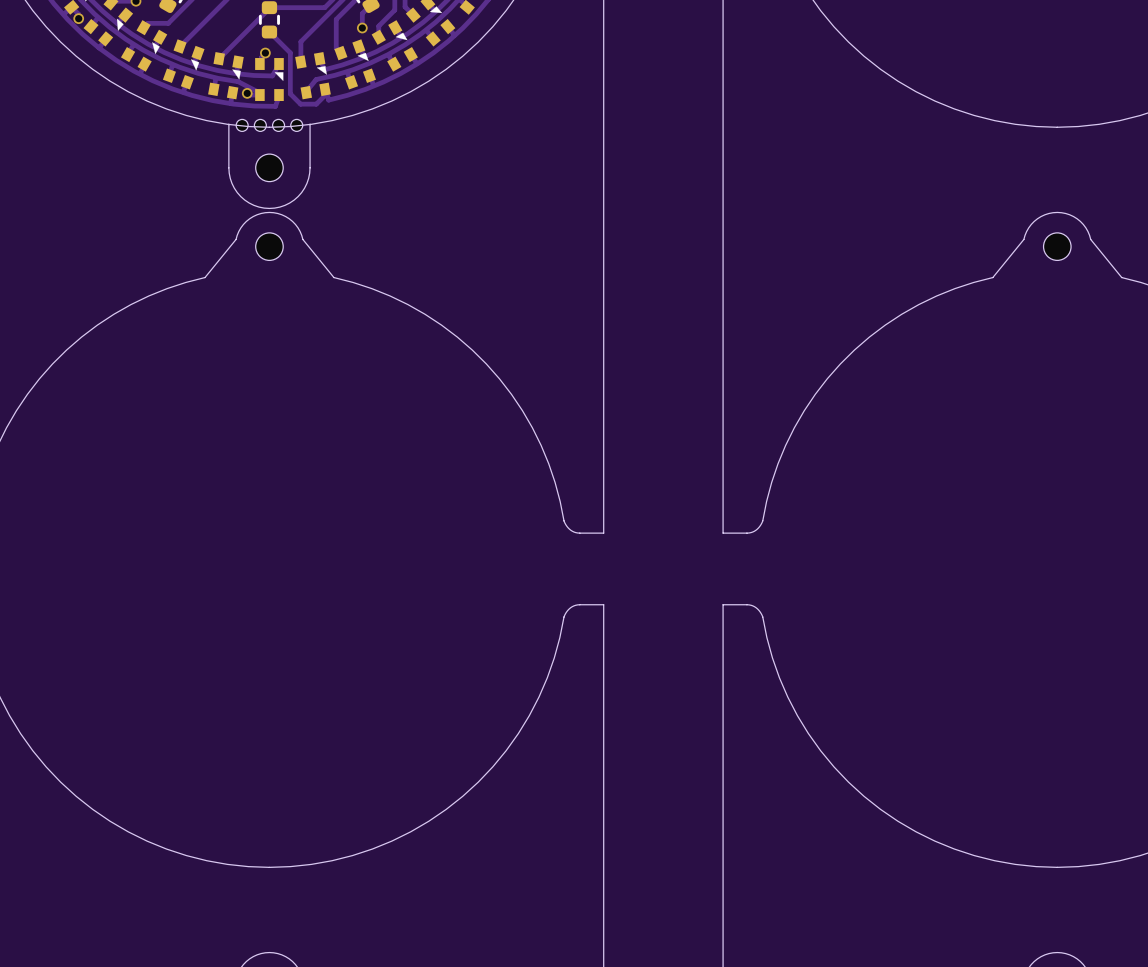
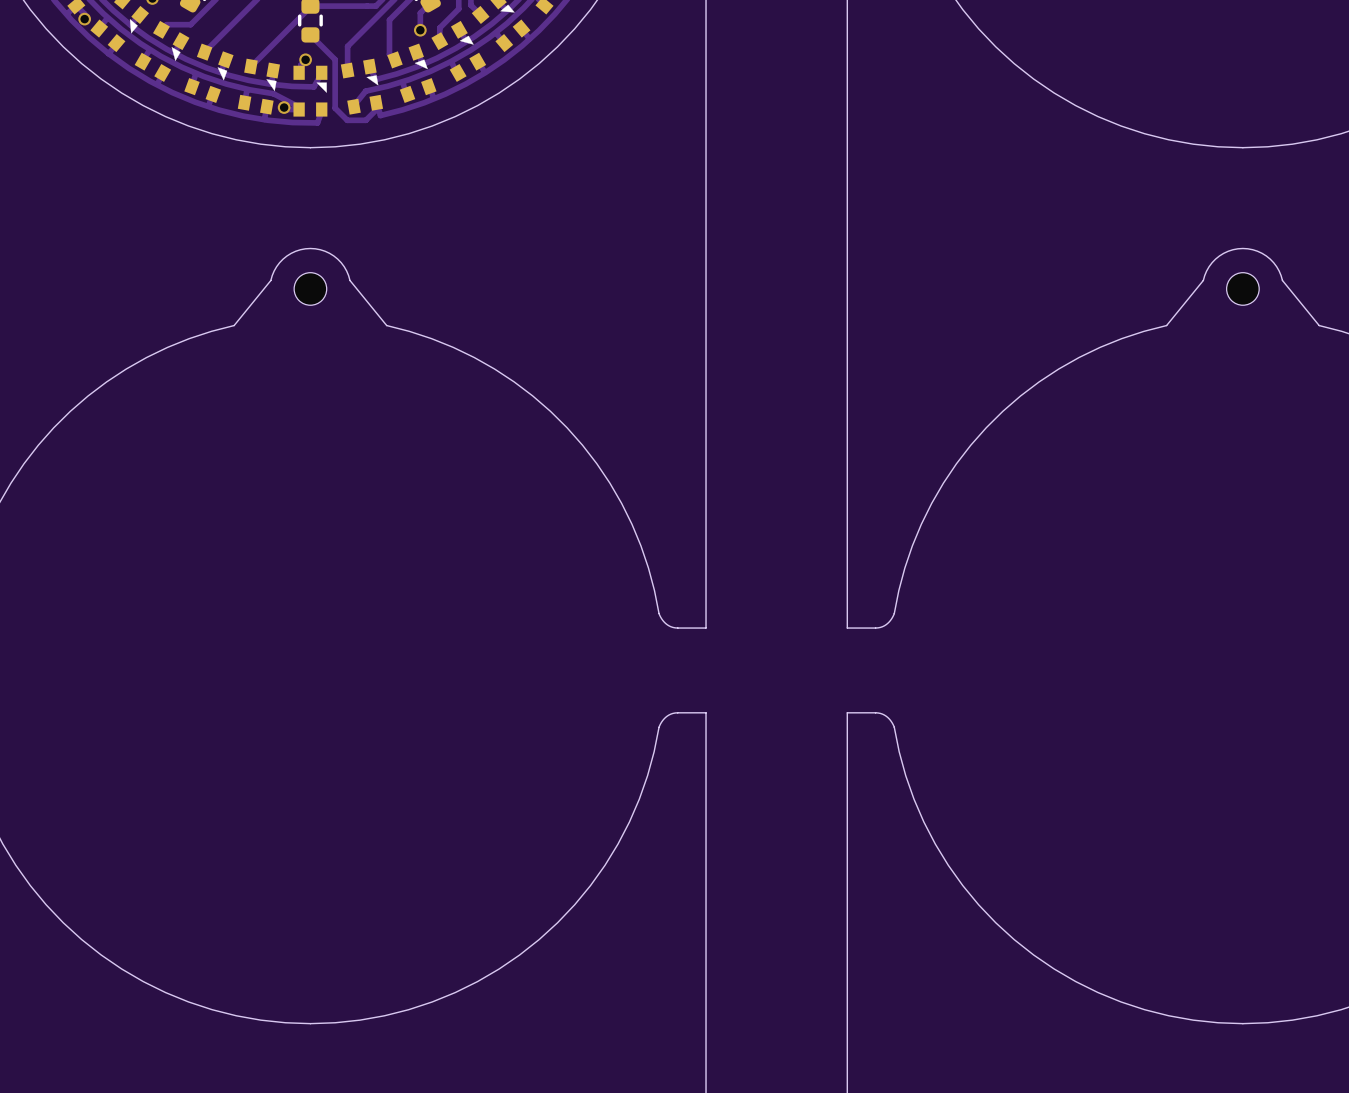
part: (269, 164) -> none

